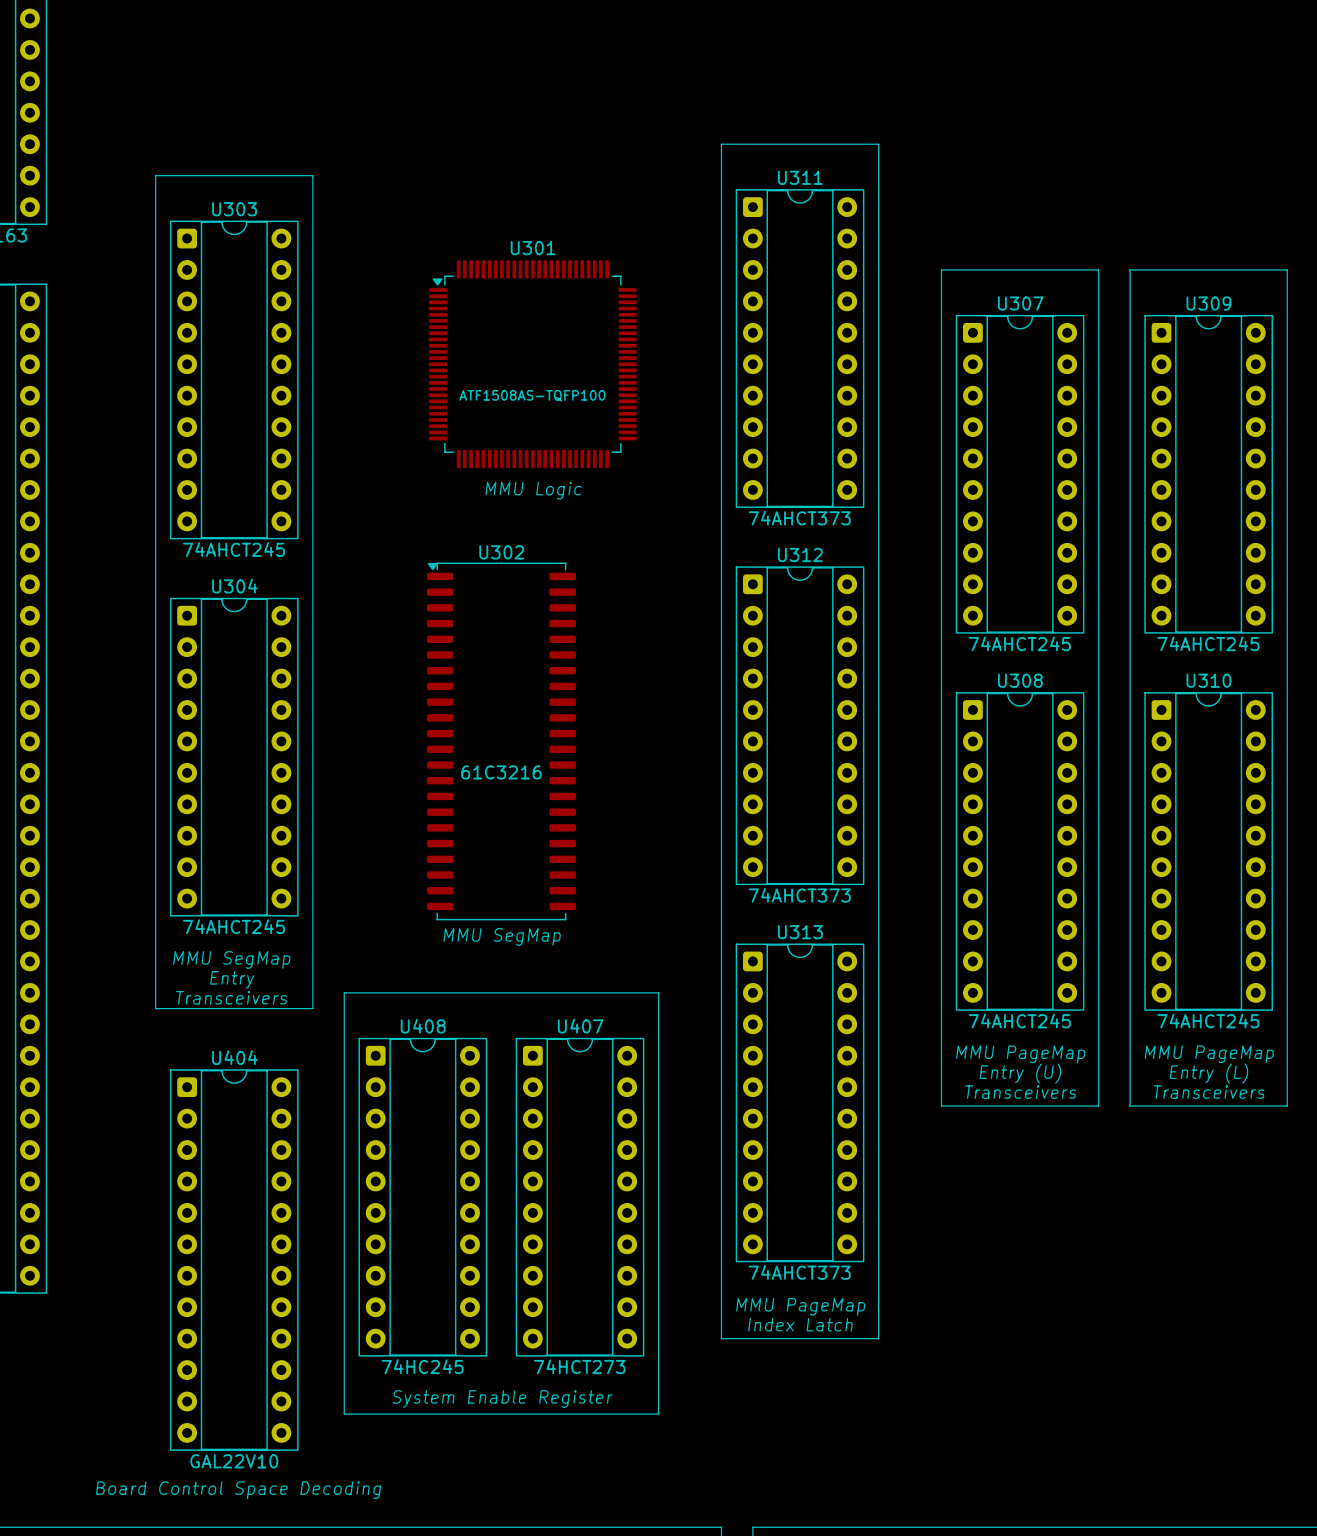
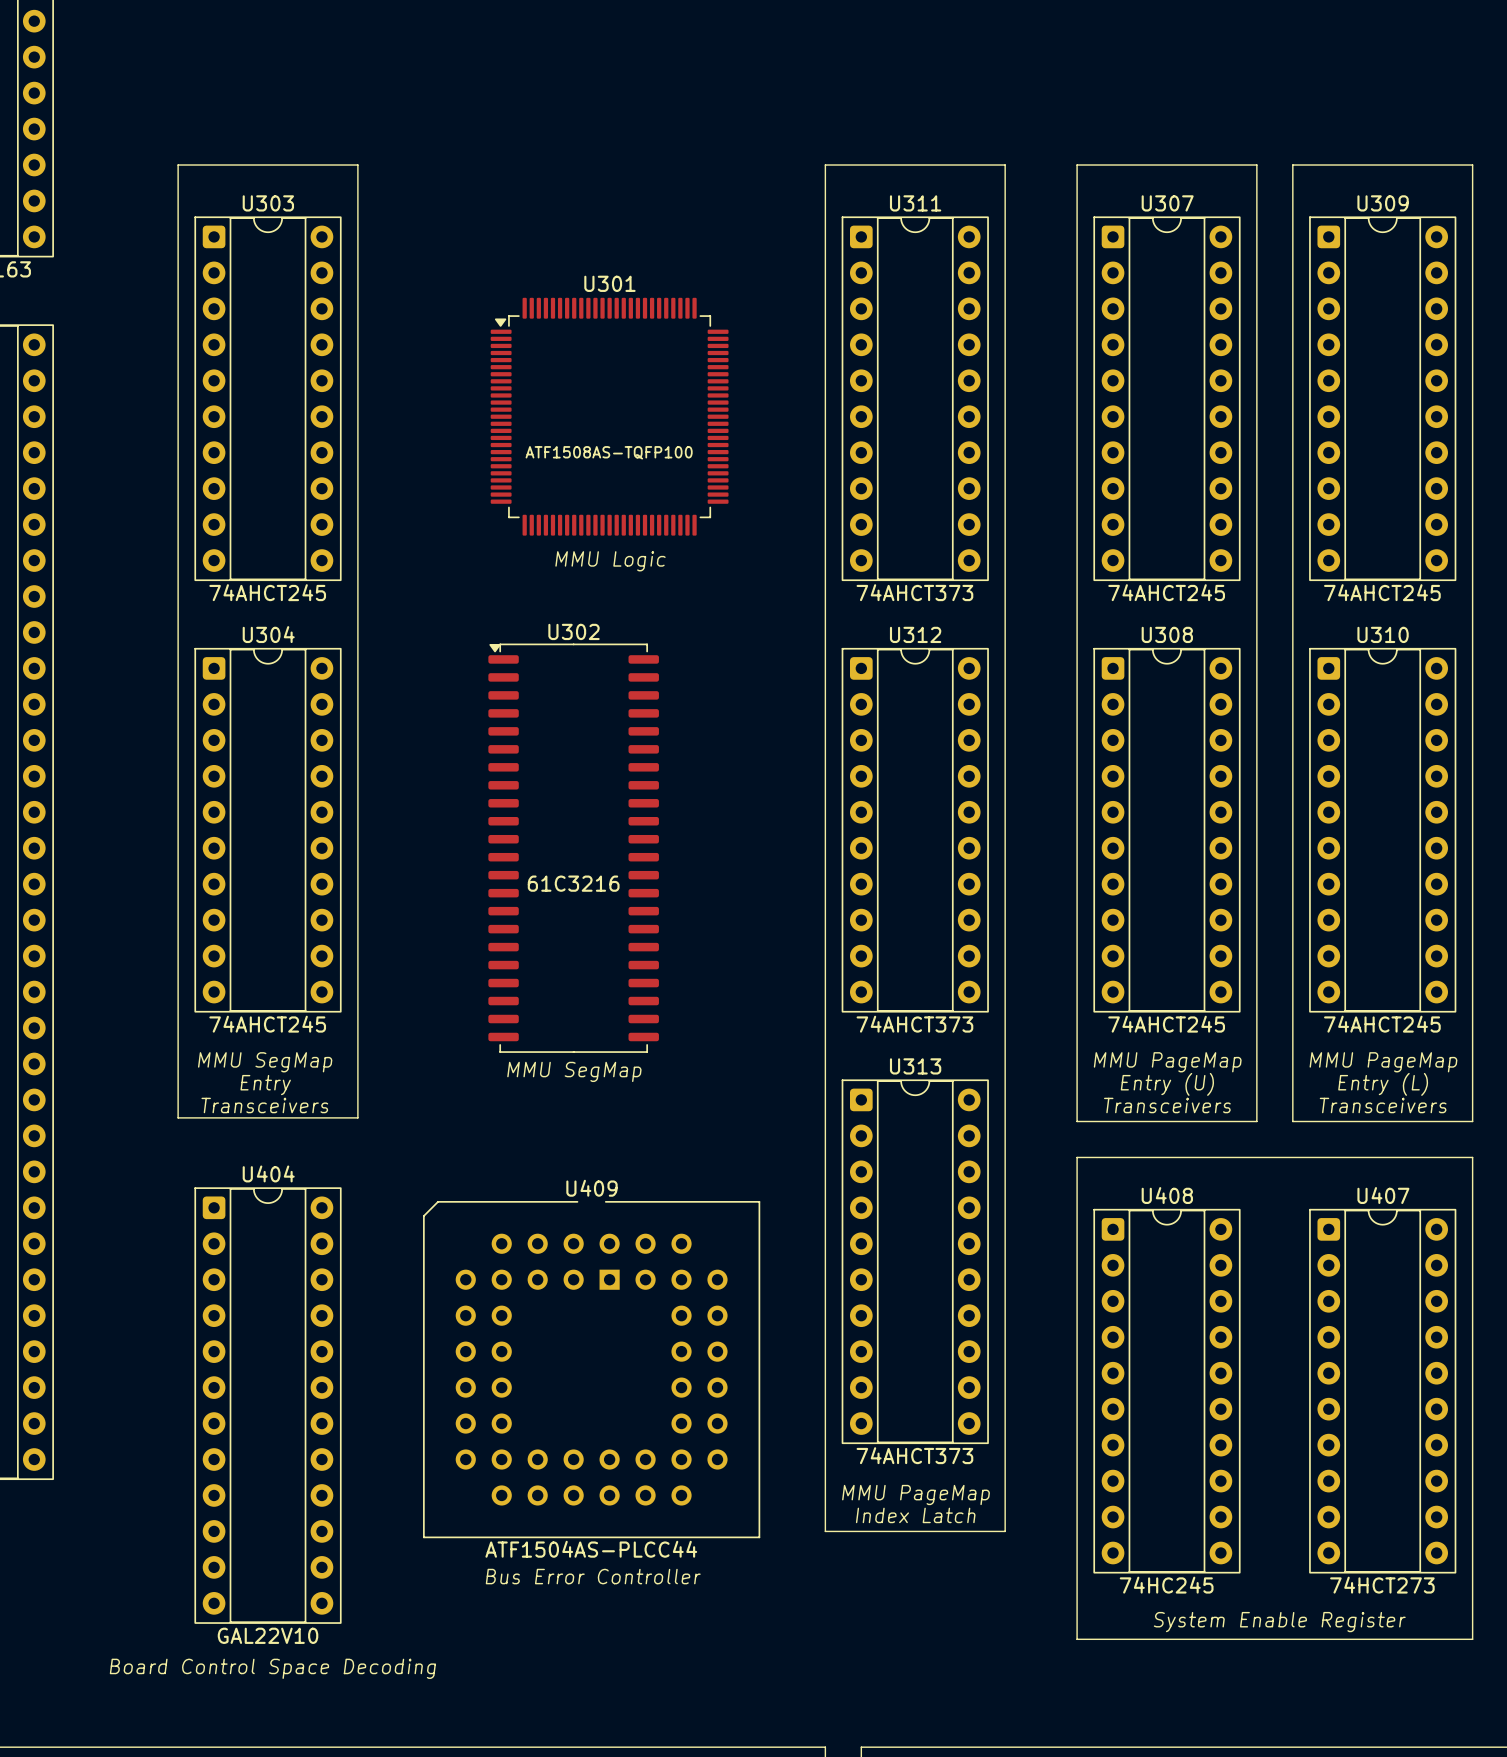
line: (155, 175) (312, 175) -> (178, 200) (178, 165) (357, 165) (357, 200)
line: (941, 269) (1098, 269) -> (1077, 308) (1077, 165) (1256, 165) (1256, 308)
line: (1130, 269) (1287, 269) -> (1292, 308) (1292, 165) (1472, 165) (1472, 308)
U303 position: (234, 379) -> (268, 398)
U307 position: (1020, 474) -> (1166, 398)
U309 position: (1208, 474) -> (1382, 398)
U304 position: (234, 757) -> (268, 830)
U308 position: (1020, 851) -> (1166, 830)
U310 position: (1208, 851) -> (1382, 830)
text: none -> MMU PageMap (1167, 1062)
text: none -> MMU PageMap (1383, 1062)
text position: MMU SegMap (231, 959) -> MMU SegMap (265, 1062)
text: none -> Transceivers (1167, 1105)
text: none -> Transceivers (1383, 1105)
line: (155, 977) (155, 1008) (312, 1008) (312, 977) -> (178, 1117) (357, 1117)
text position: Entry (232, 979) -> Entry (265, 1085)
line: (941, 980) (941, 1011) -> (1472, 1157) (1077, 1157)
line: (1098, 980) (1098, 1106) (941, 1106) -> (1256, 1121) (1077, 1121)
line: (1130, 980) (1130, 1106) (1287, 1106) -> (1292, 1121) (1472, 1121)
line: (1287, 980) (1287, 1011) -> none
line: (344, 992) (658, 992) (658, 1414) (344, 1414) (344, 992) -> none
text position: Transceivers (231, 997) -> Transceivers (264, 1105)
text: MMU PageMap (1020, 1054) -> none
text: MMU PageMap (1209, 1054) -> none
text position: Entry (U) (1020, 1073) -> Entry (U) (1167, 1084)
text position: Entry (L) (1209, 1073) -> Entry (L) (1383, 1084)
text: Transceivers (1020, 1092) -> none
text: Transceivers (1209, 1092) -> none
line: none -> (1077, 1265) (1077, 1639) (1472, 1639) (1472, 1265)
U408 position: (422, 1197) -> (1166, 1391)
U409: none -> ATF1504AS-PLCC44 (591, 1369)
U407 position: (580, 1197) -> (1382, 1391)
U404 position: (234, 1260) -> (268, 1405)
text: none -> Bus Error Controller (593, 1576)
text: System Enable Register (502, 1399) -> none
text: none -> System Enable Register (1279, 1622)
text position: Board Control Space Decoding (238, 1490) -> Board Control Space Decoding (272, 1668)

